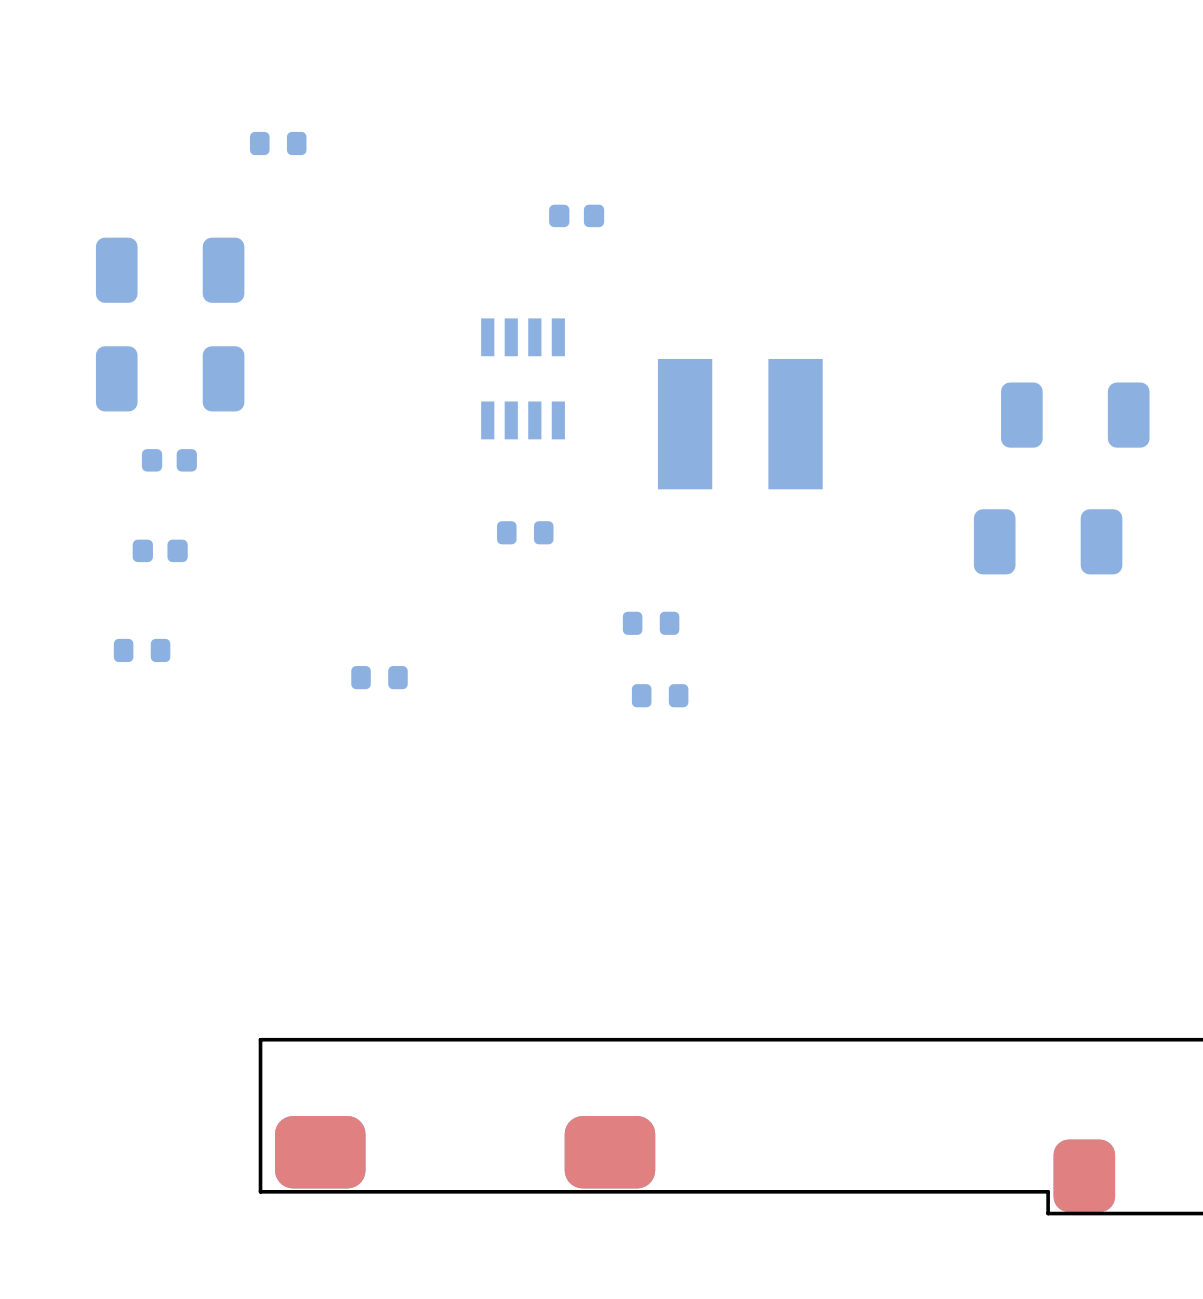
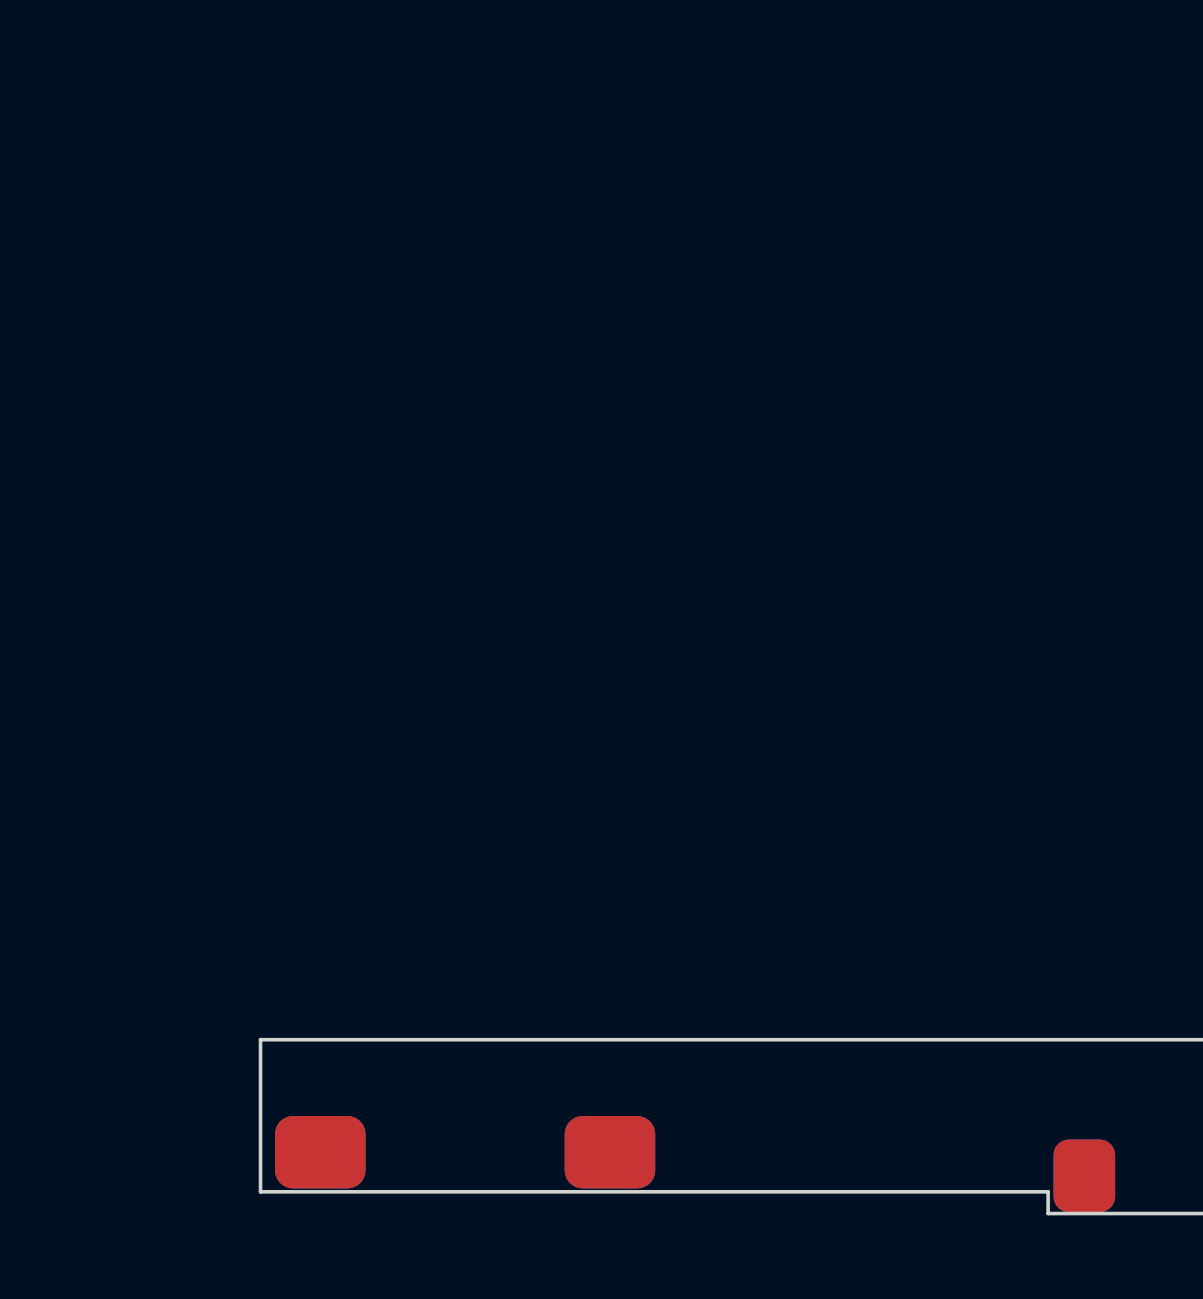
part: (278, 143) -> none
part: (576, 215) -> none
part: (170, 270) -> none
part: (170, 378) -> none
part: (523, 378) -> none
part: (1075, 415) -> none
part: (740, 424) -> none
part: (169, 460) -> none
part: (525, 532) -> none
part: (1048, 541) -> none
part: (160, 550) -> none
part: (651, 623) -> none
part: (142, 650) -> none
part: (379, 677) -> none
part: (660, 695) -> none

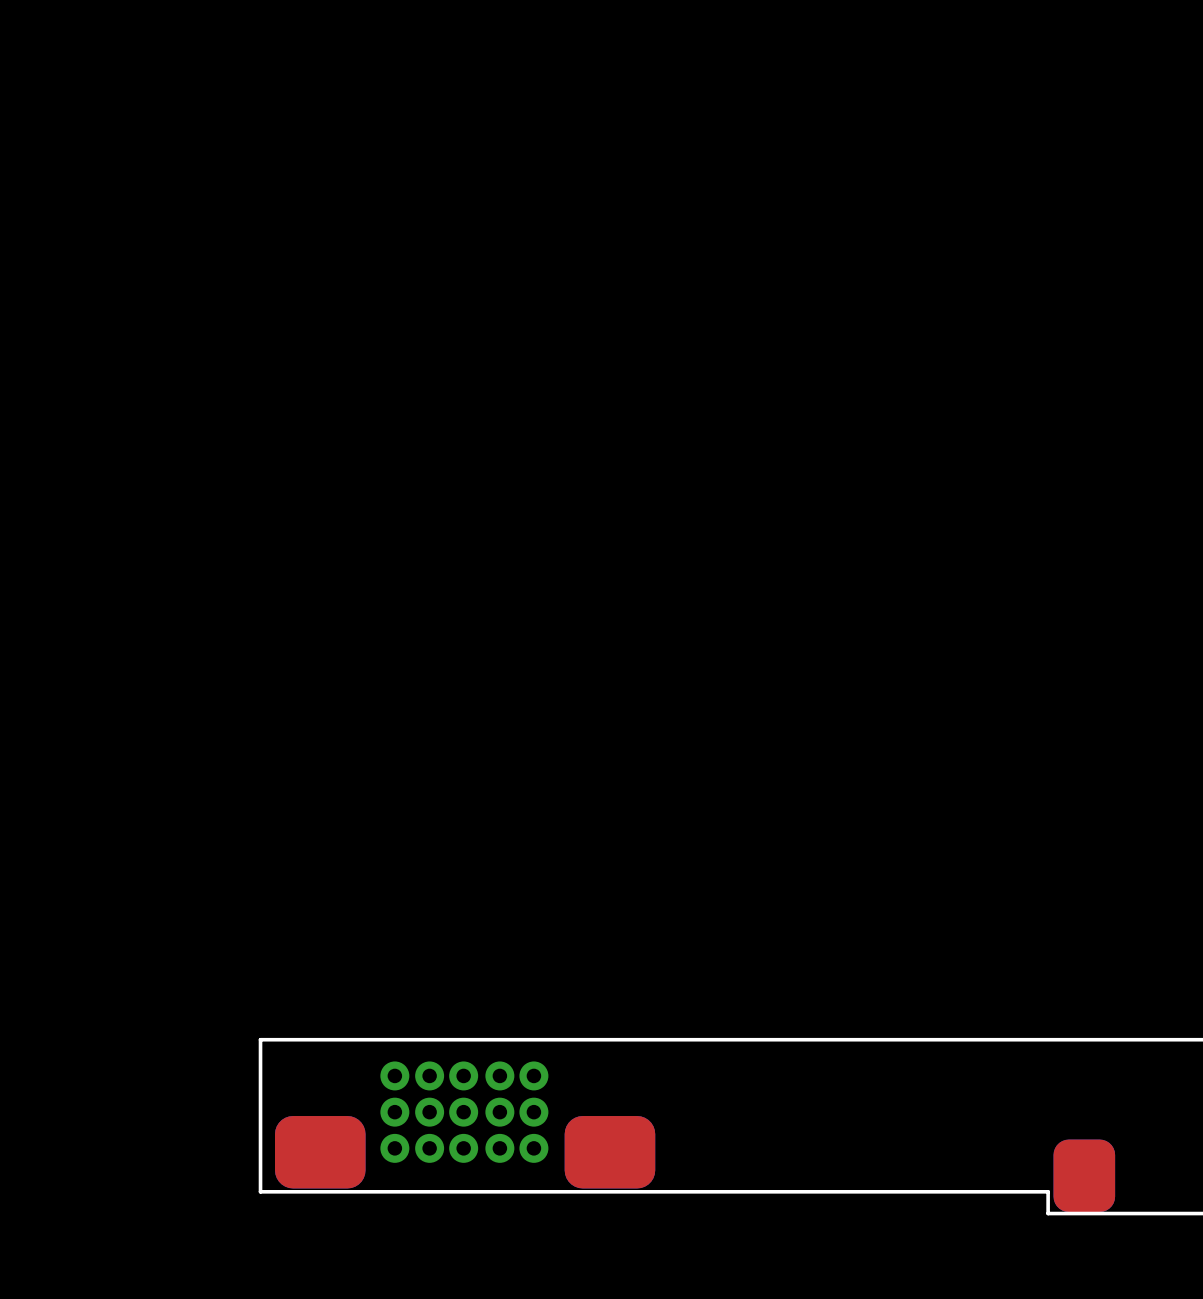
via: none -> (394, 1075)
via: none -> (429, 1075)
via: none -> (463, 1075)
via: none -> (499, 1075)
via: none -> (533, 1075)
via: none -> (394, 1112)
via: none -> (429, 1112)
via: none -> (463, 1112)
via: none -> (499, 1112)
via: none -> (533, 1112)
via: none -> (394, 1148)
via: none -> (429, 1148)
via: none -> (463, 1148)
via: none -> (499, 1148)
via: none -> (533, 1148)

